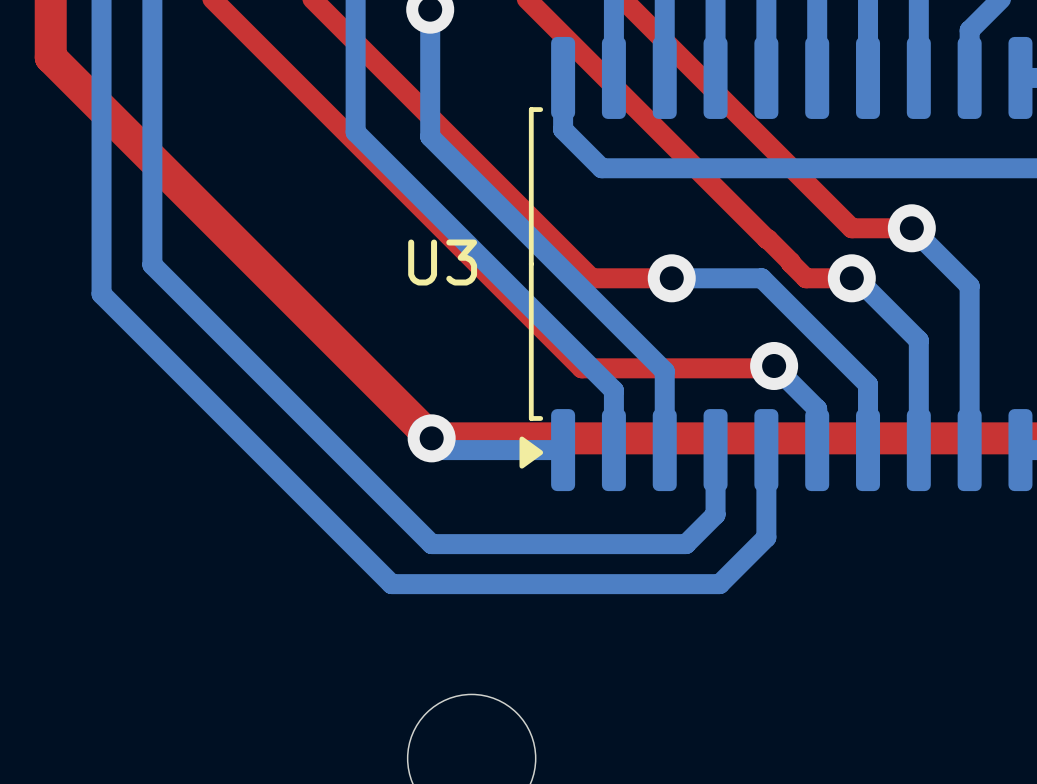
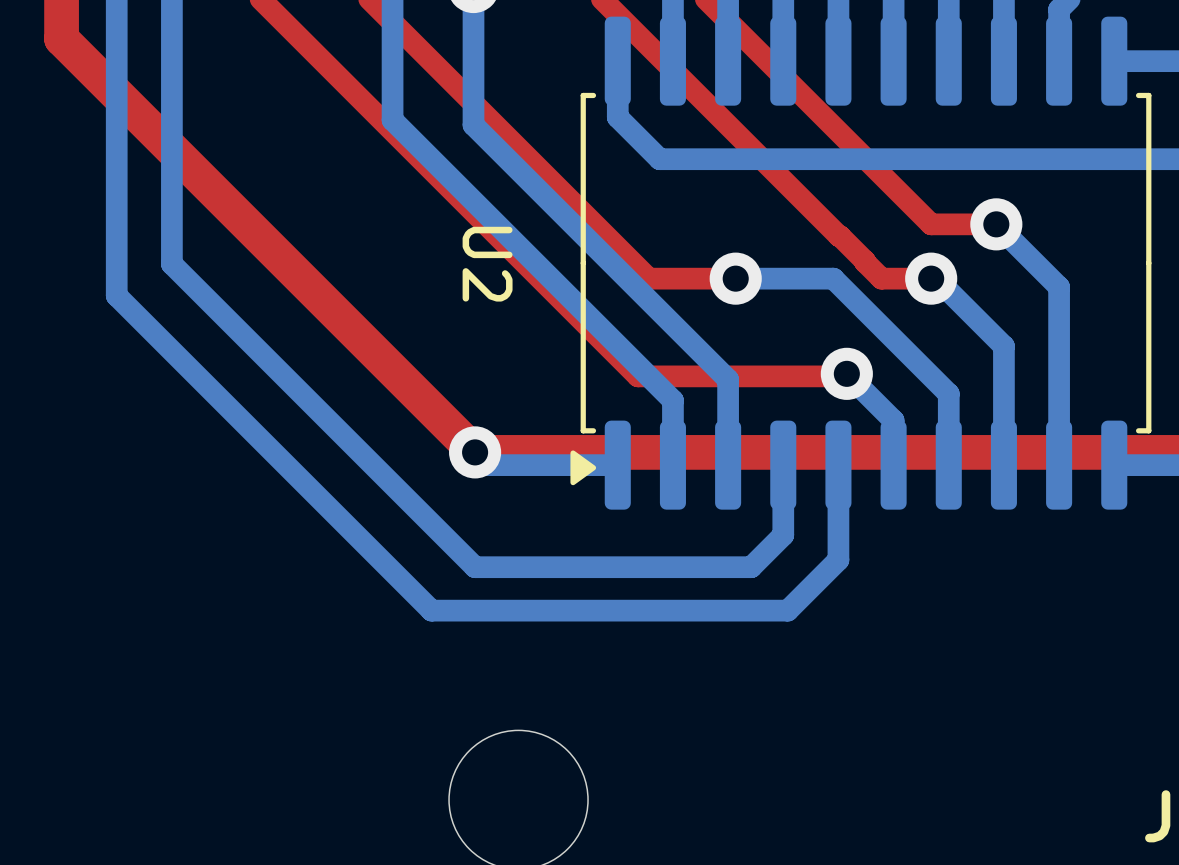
U3 name: U3 (442, 262) -> U2 (487, 264)

